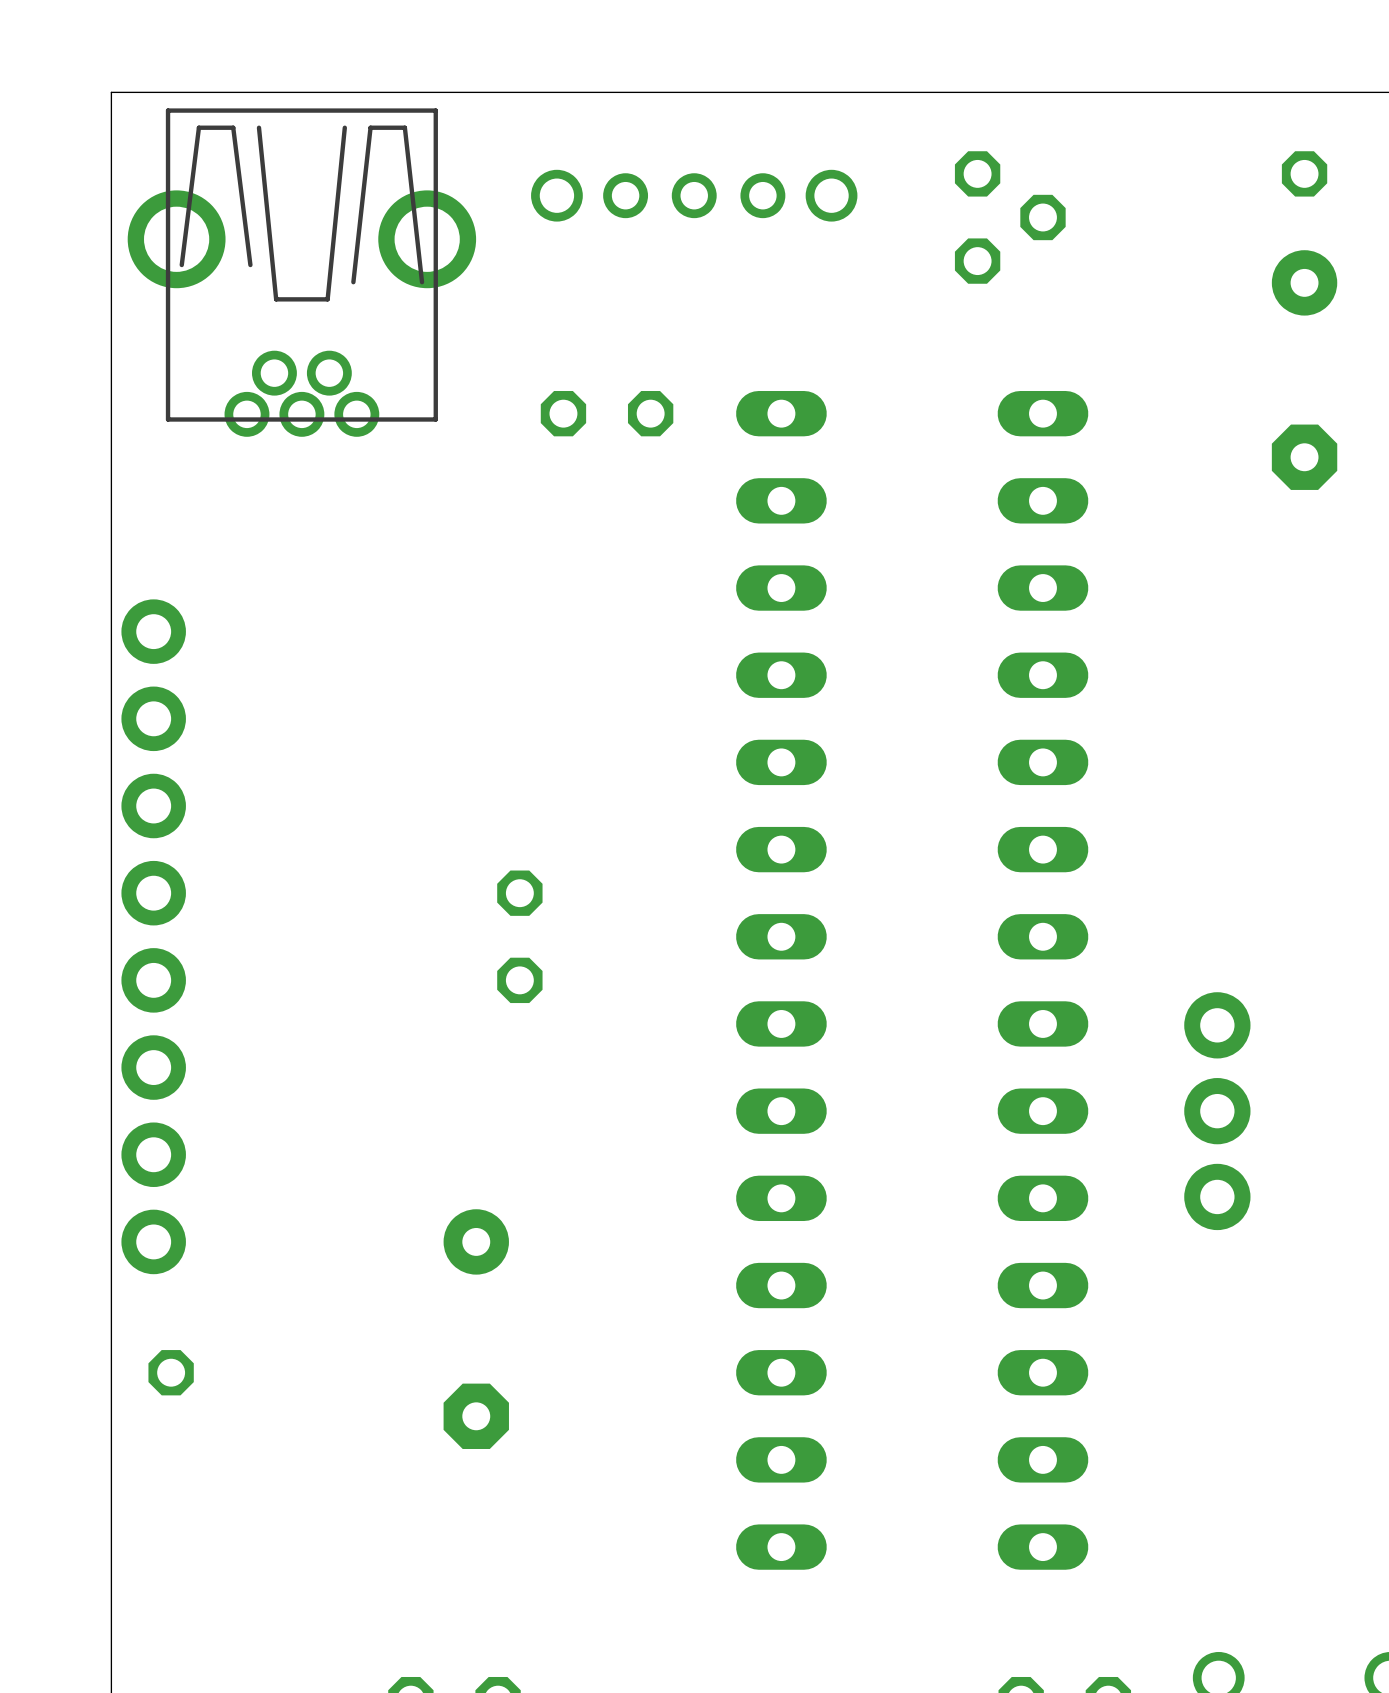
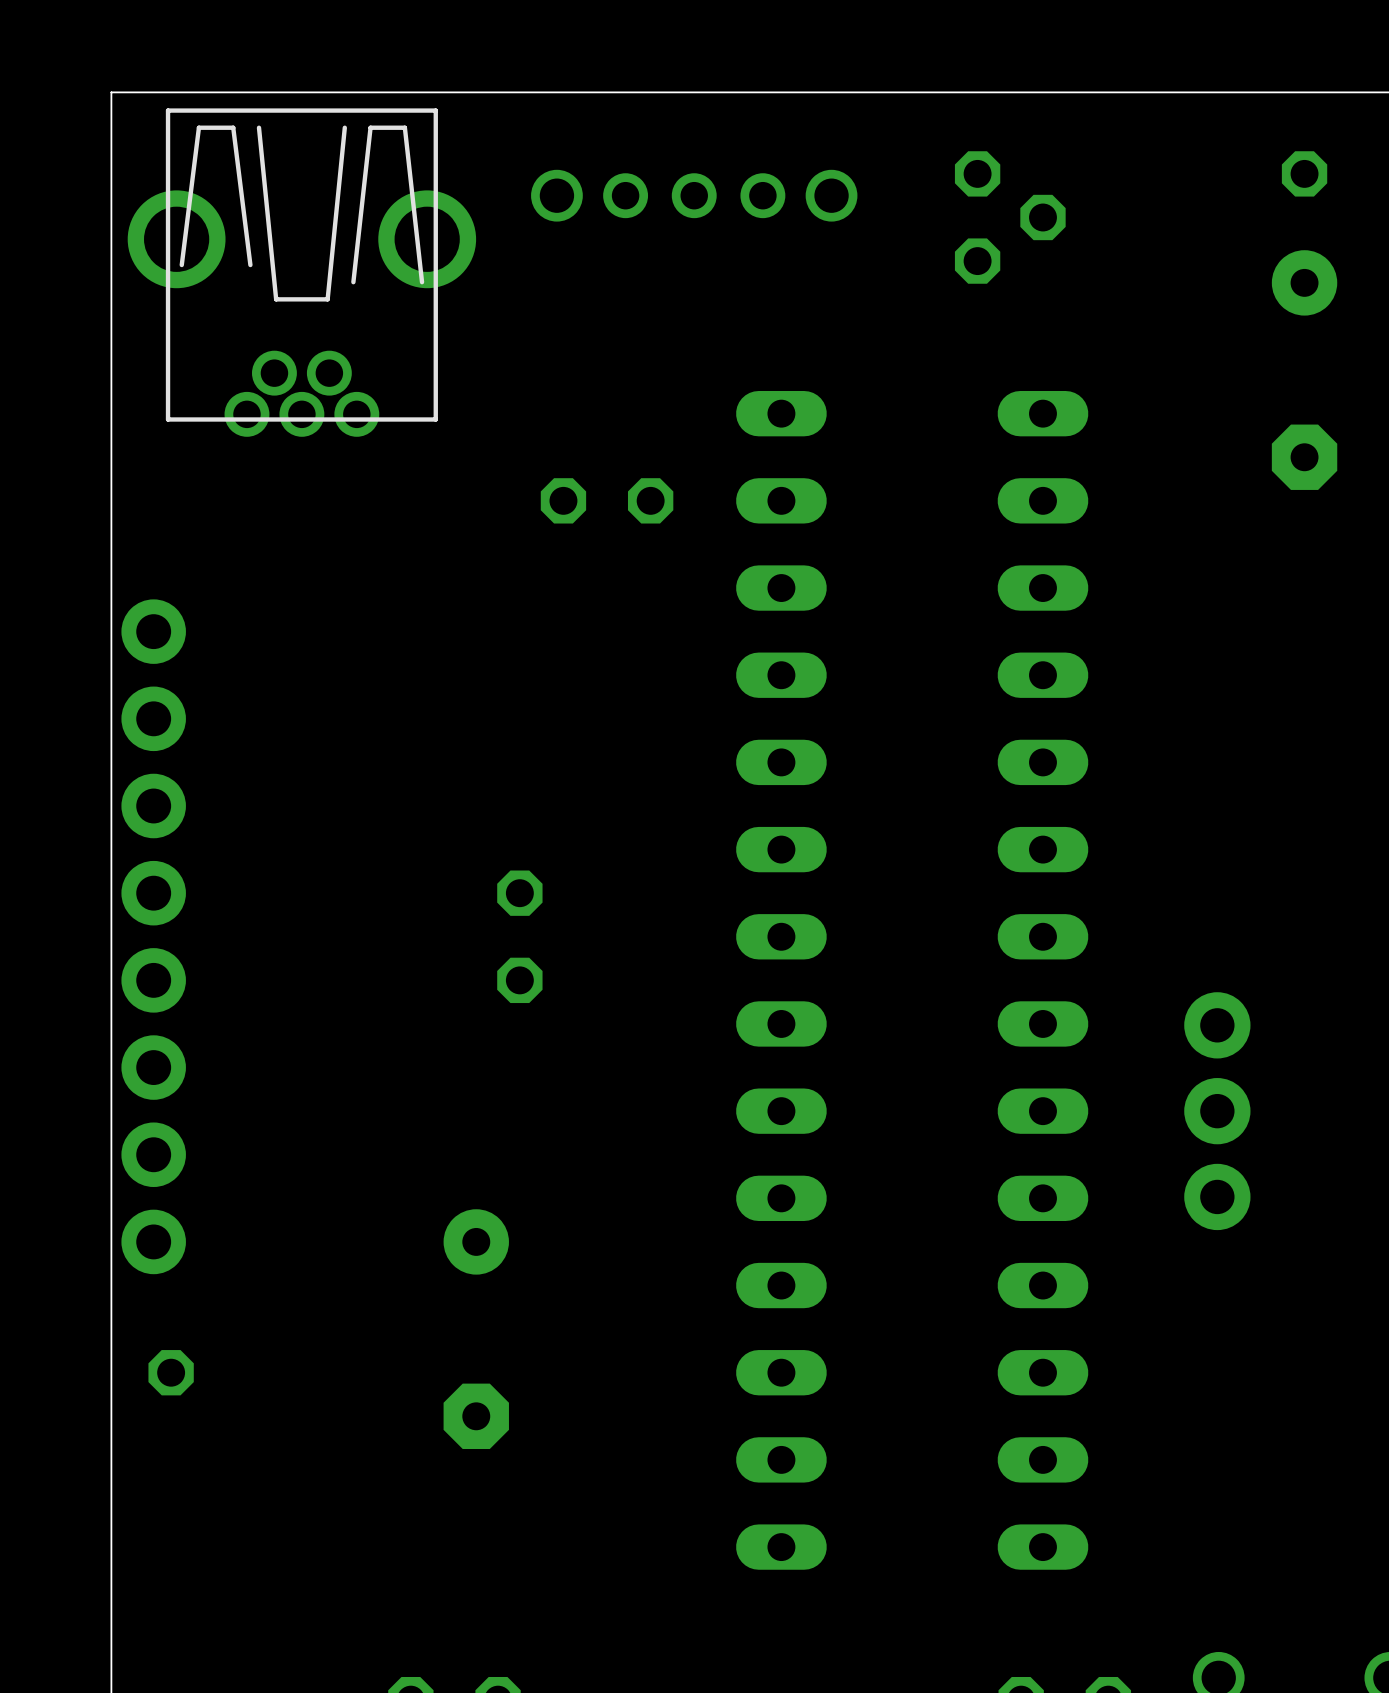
part position: (607, 413) -> (607, 500)

